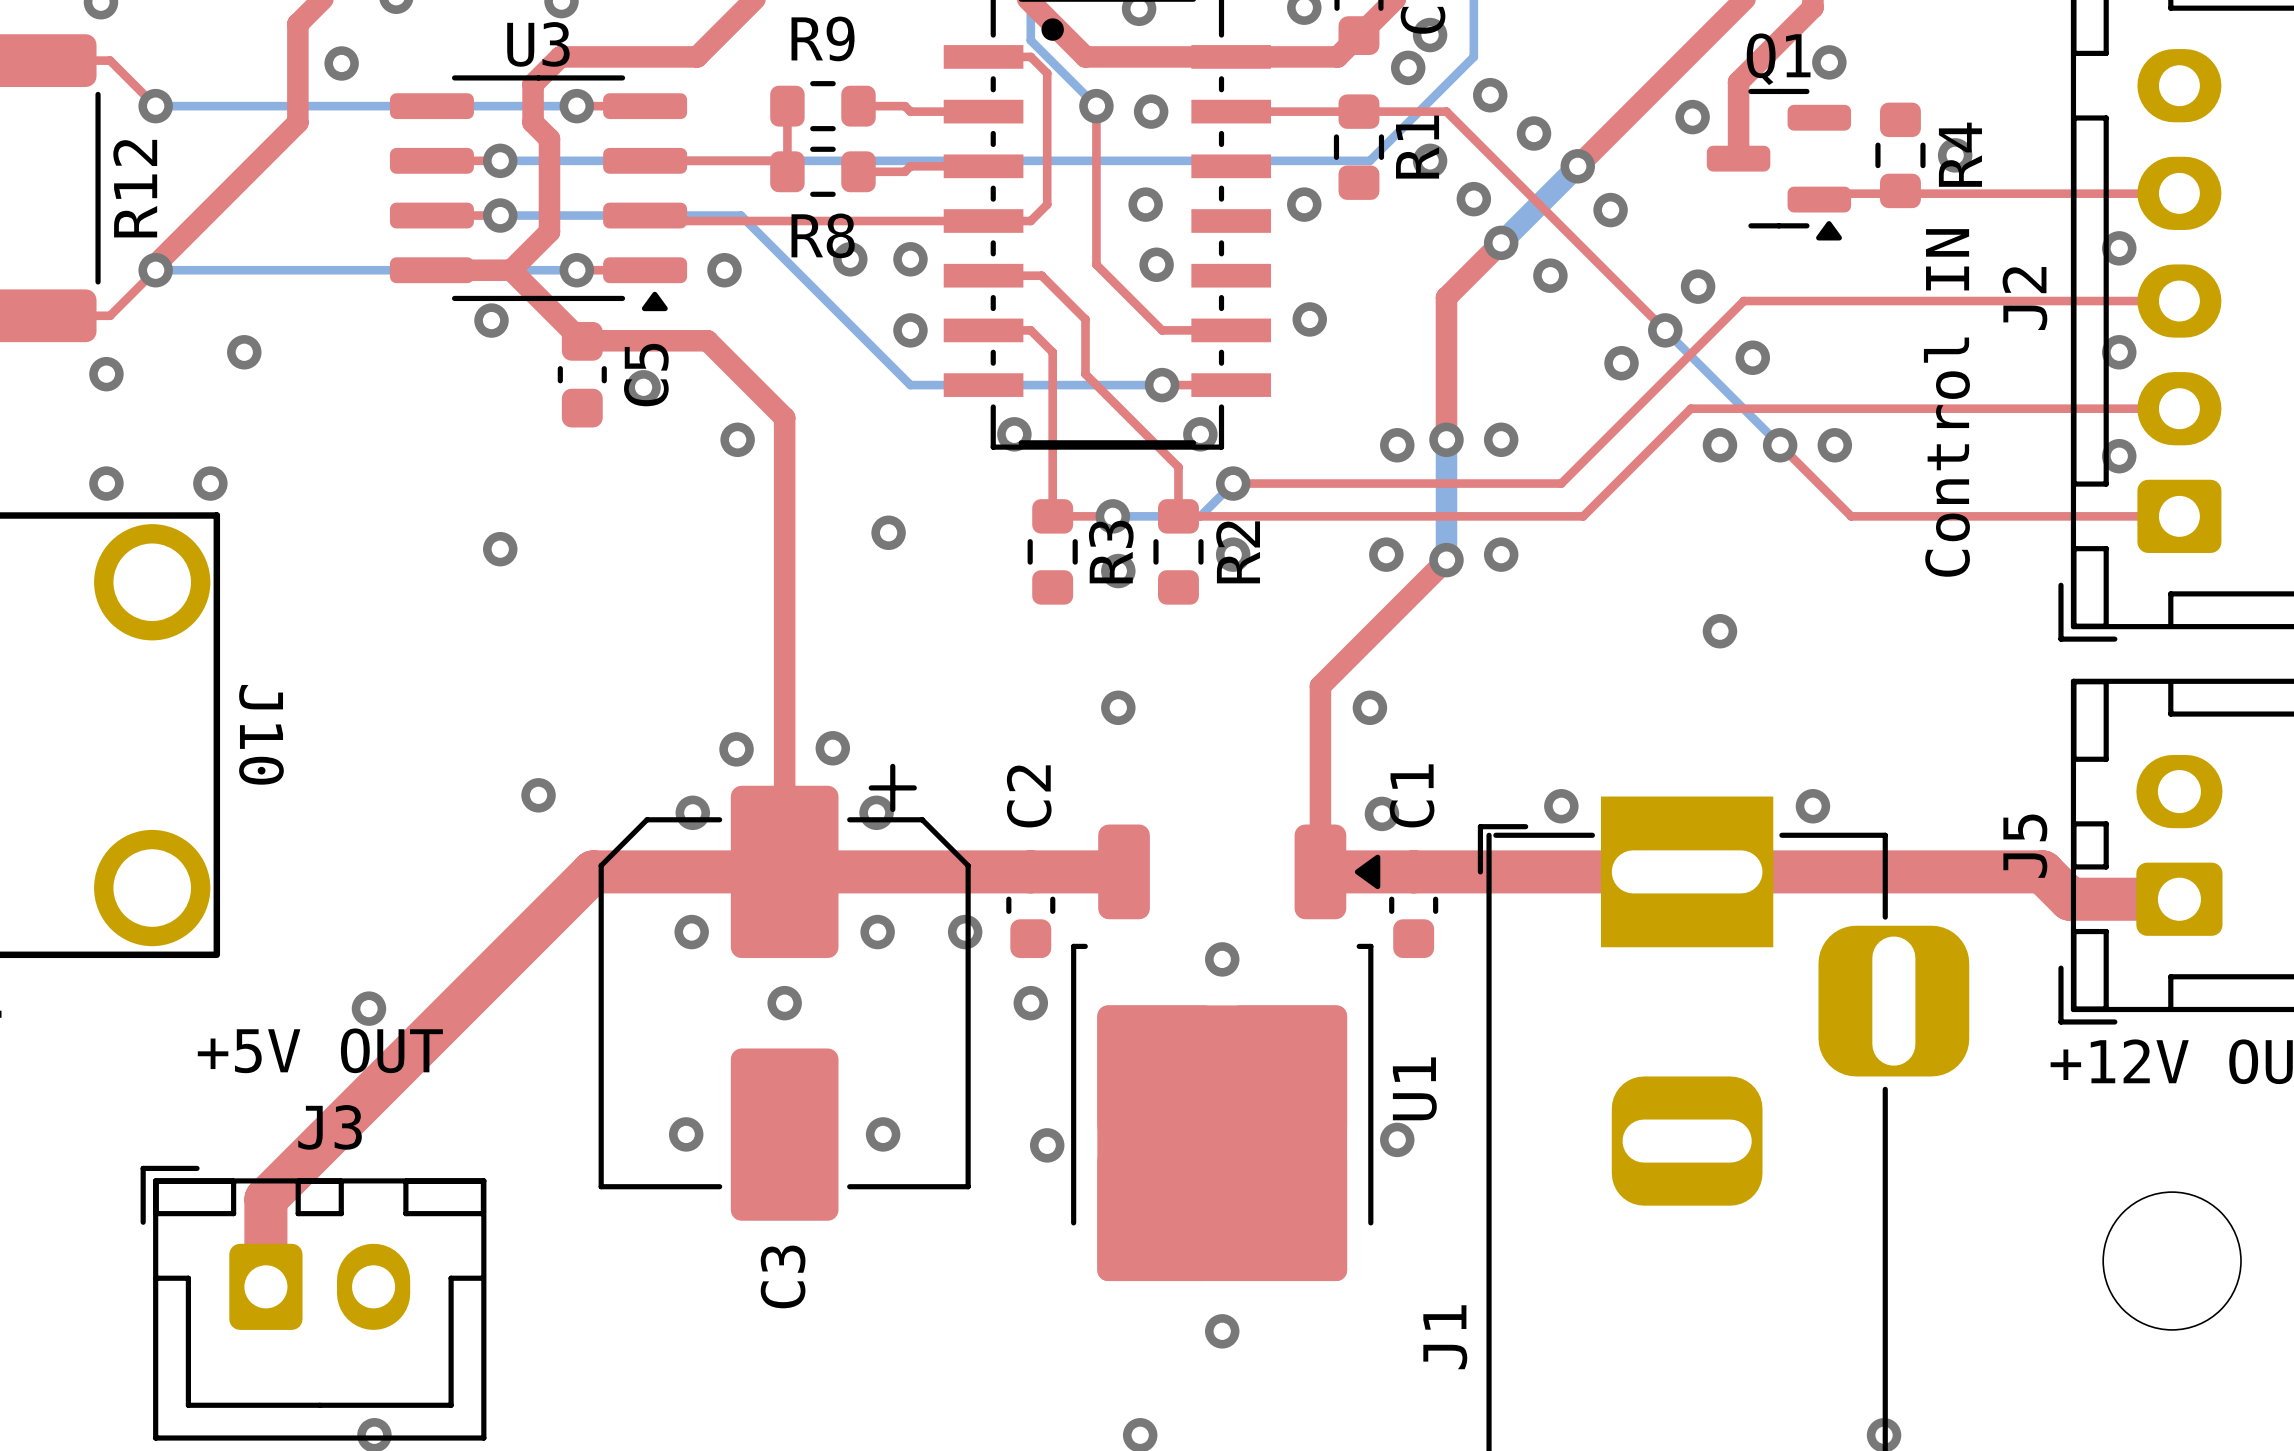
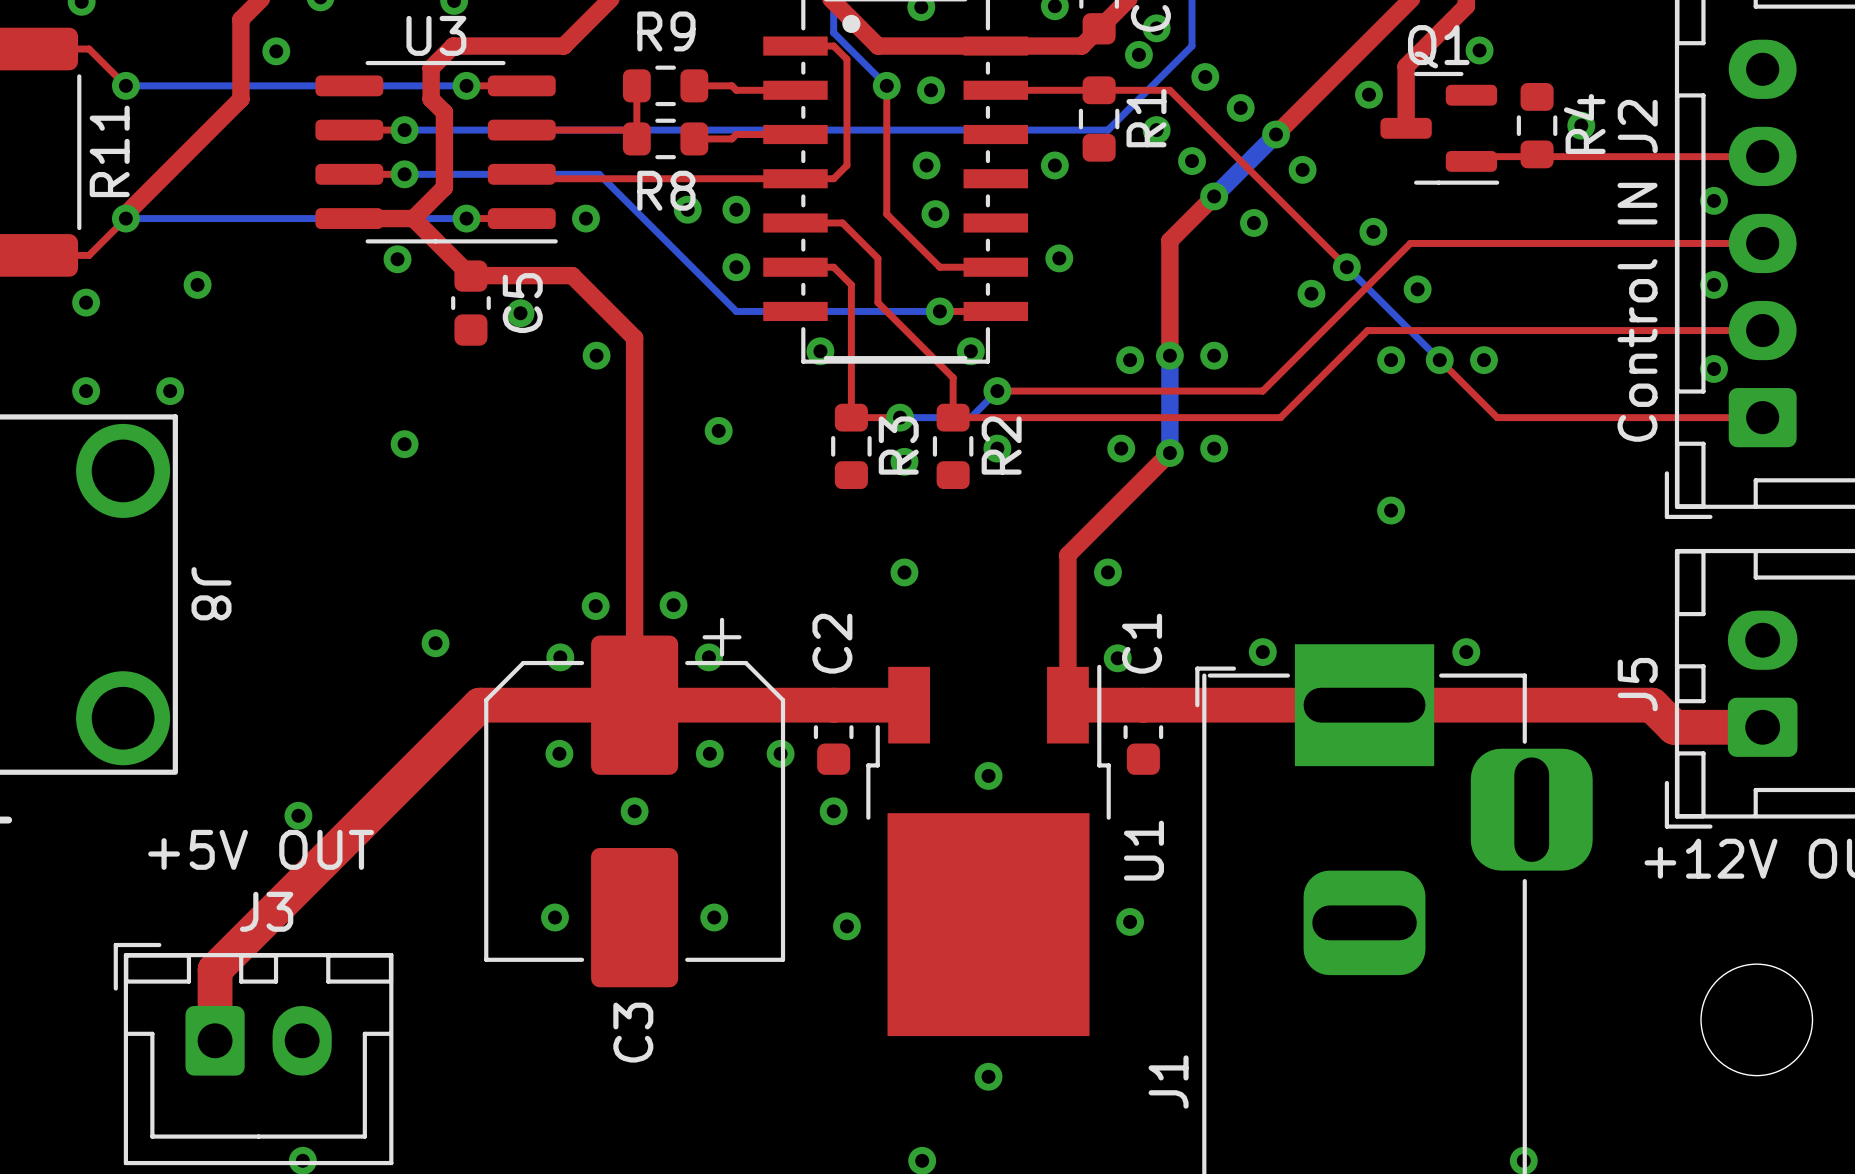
U3 footprint: [389, 75, 688, 312] -> [315, 60, 558, 244]
Q1 footprint: [1706, 88, 1852, 241] -> [1380, 71, 1500, 185]
R12 name: R12 (135, 188) -> R11 (109, 151)
J2 name position: J2 (2024, 298) -> J2 (1637, 126)
text position: Control IN (1946, 402) -> Control IN (1637, 312)
J10 name: J10 (261, 734) -> J8 (211, 593)
U1 footprint: [1071, 824, 1381, 1282] -> [866, 664, 1111, 1037]

